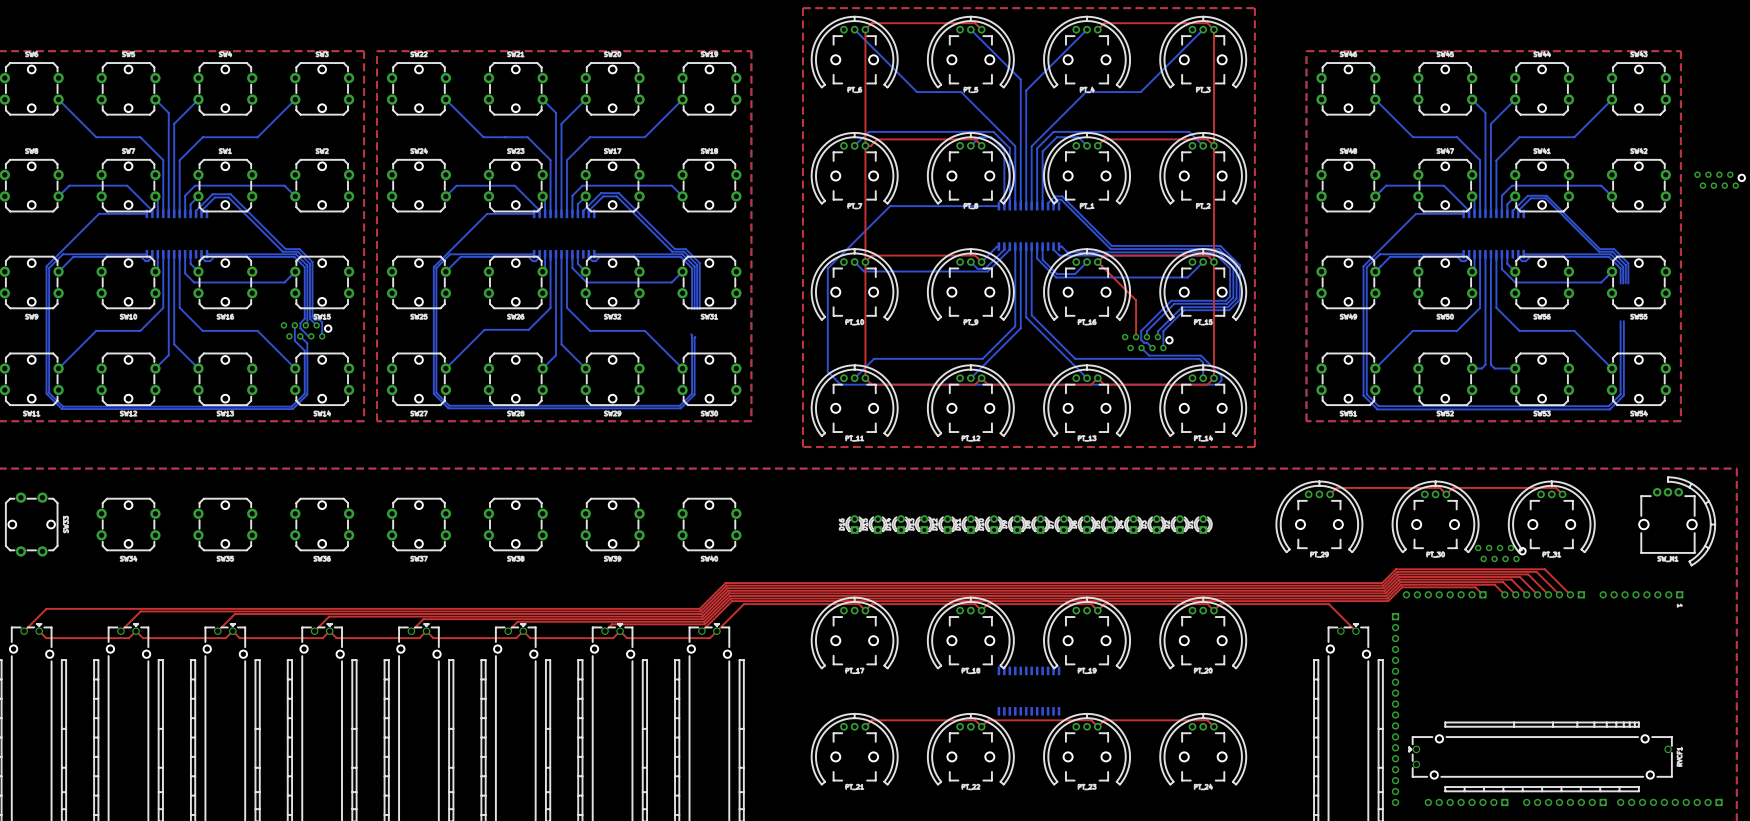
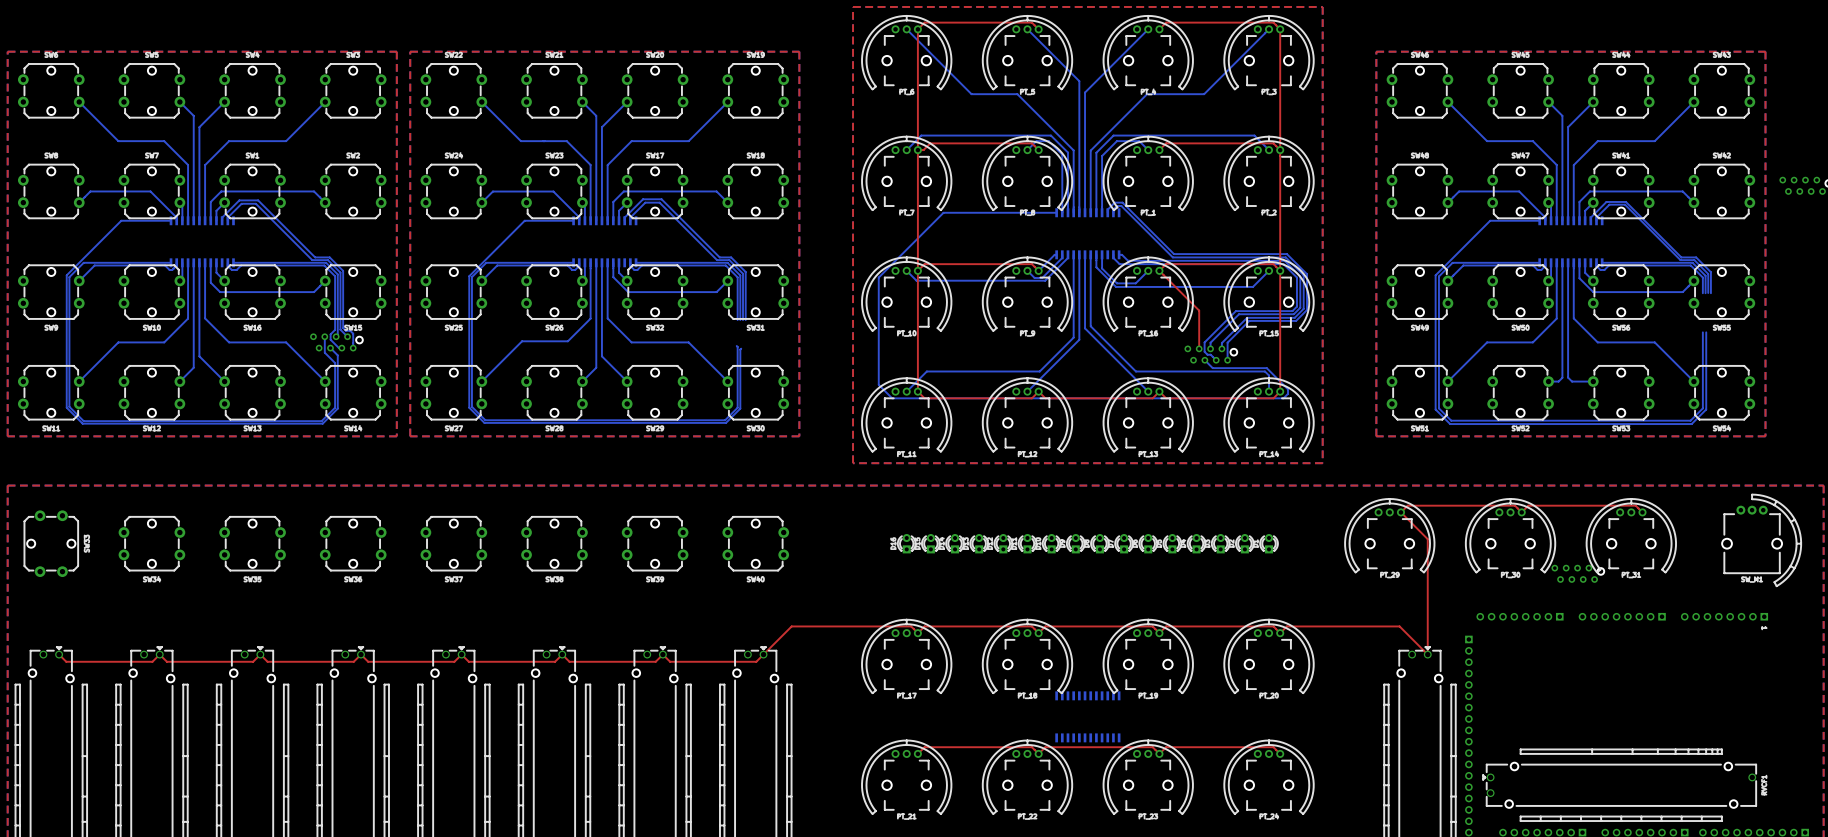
top track: none -> (1400, 512) (1427, 539) (1427, 654)
top track: (1482, 594) (1475, 587) (1402, 587) (1388, 601) (731, 601) (701, 631) -> none
top track: (1504, 594) (1494, 584) (1401, 584) (1387, 598) (730, 598) (704, 624) (611, 624) (605, 631) -> none
top track: (1515, 594) (1503, 582) (1400, 582) (1386, 595) (729, 595) (704, 621) (517, 621) (508, 631) -> none
top track: (1526, 594) (1511, 579) (1399, 579) (1385, 593) (729, 593) (703, 619) (423, 619) (411, 631) -> none
top track: (1537, 594) (1519, 577) (1398, 577) (1384, 590) (728, 590) (702, 616) (329, 616) (314, 631) -> none
top track: (1548, 594) (1528, 574) (1397, 574) (1383, 588) (727, 588) (701, 614) (234, 614) (217, 631) -> none
top track: (1559, 594) (1536, 571) (1396, 571) (1383, 585) (726, 585) (700, 611) (140, 611) (120, 631) -> none
top track: (1570, 594) (1544, 569) (1396, 569) (1382, 583) (725, 583) (699, 608) (46, 608) (24, 631) -> none

